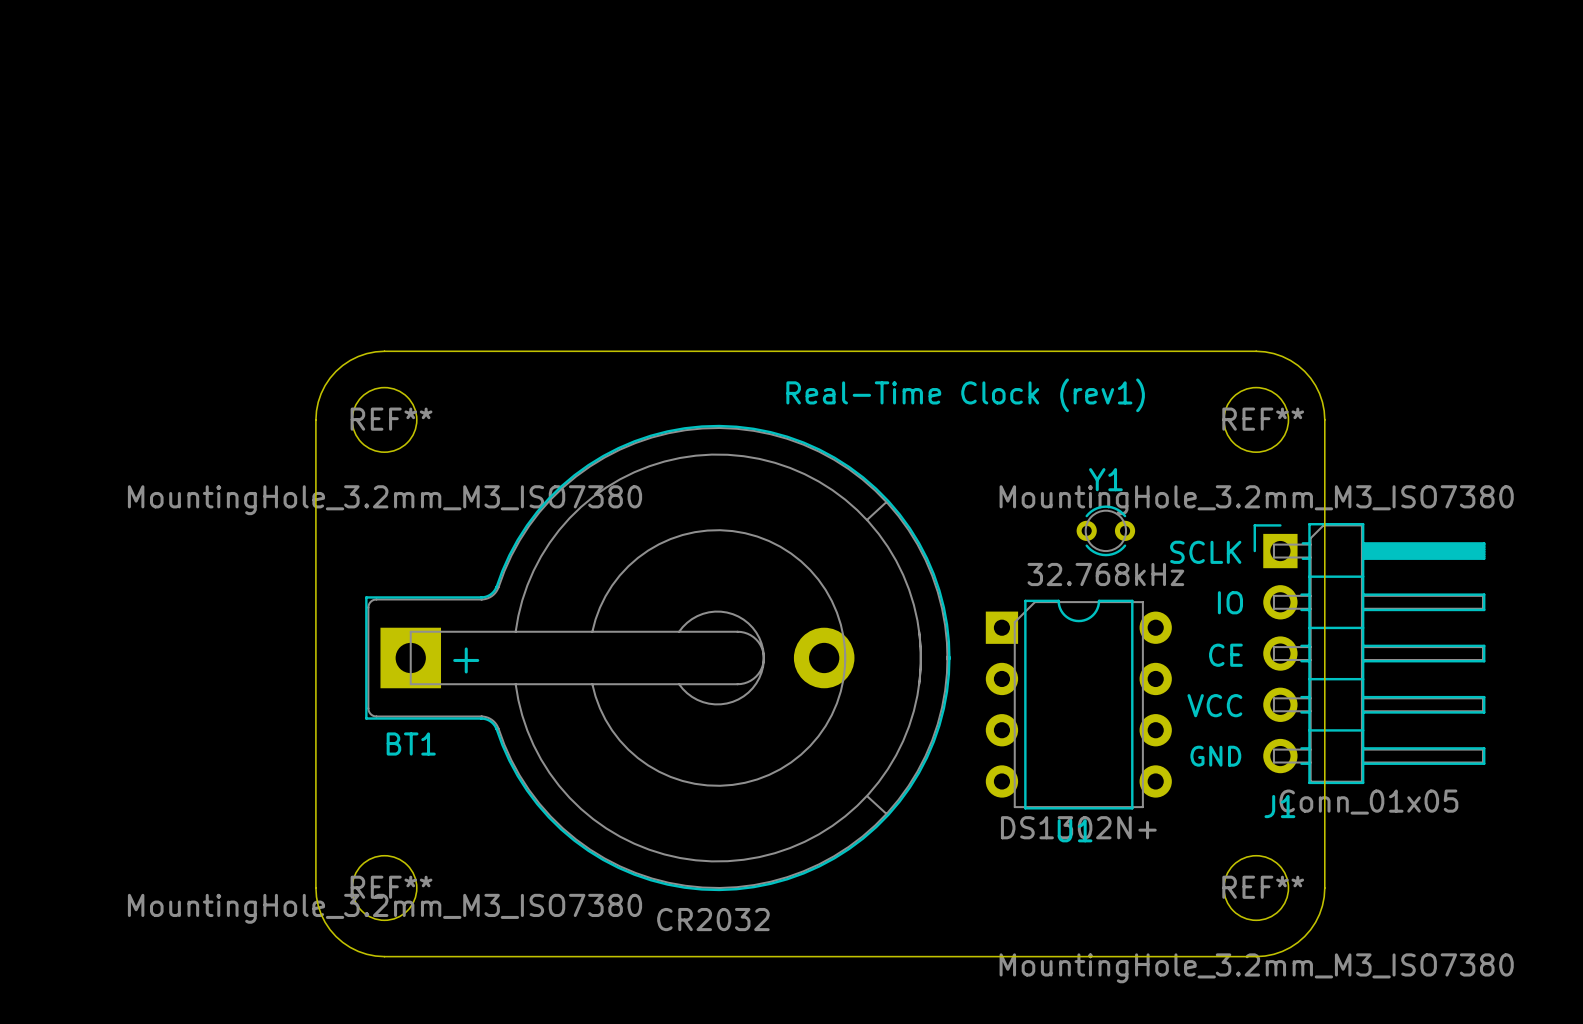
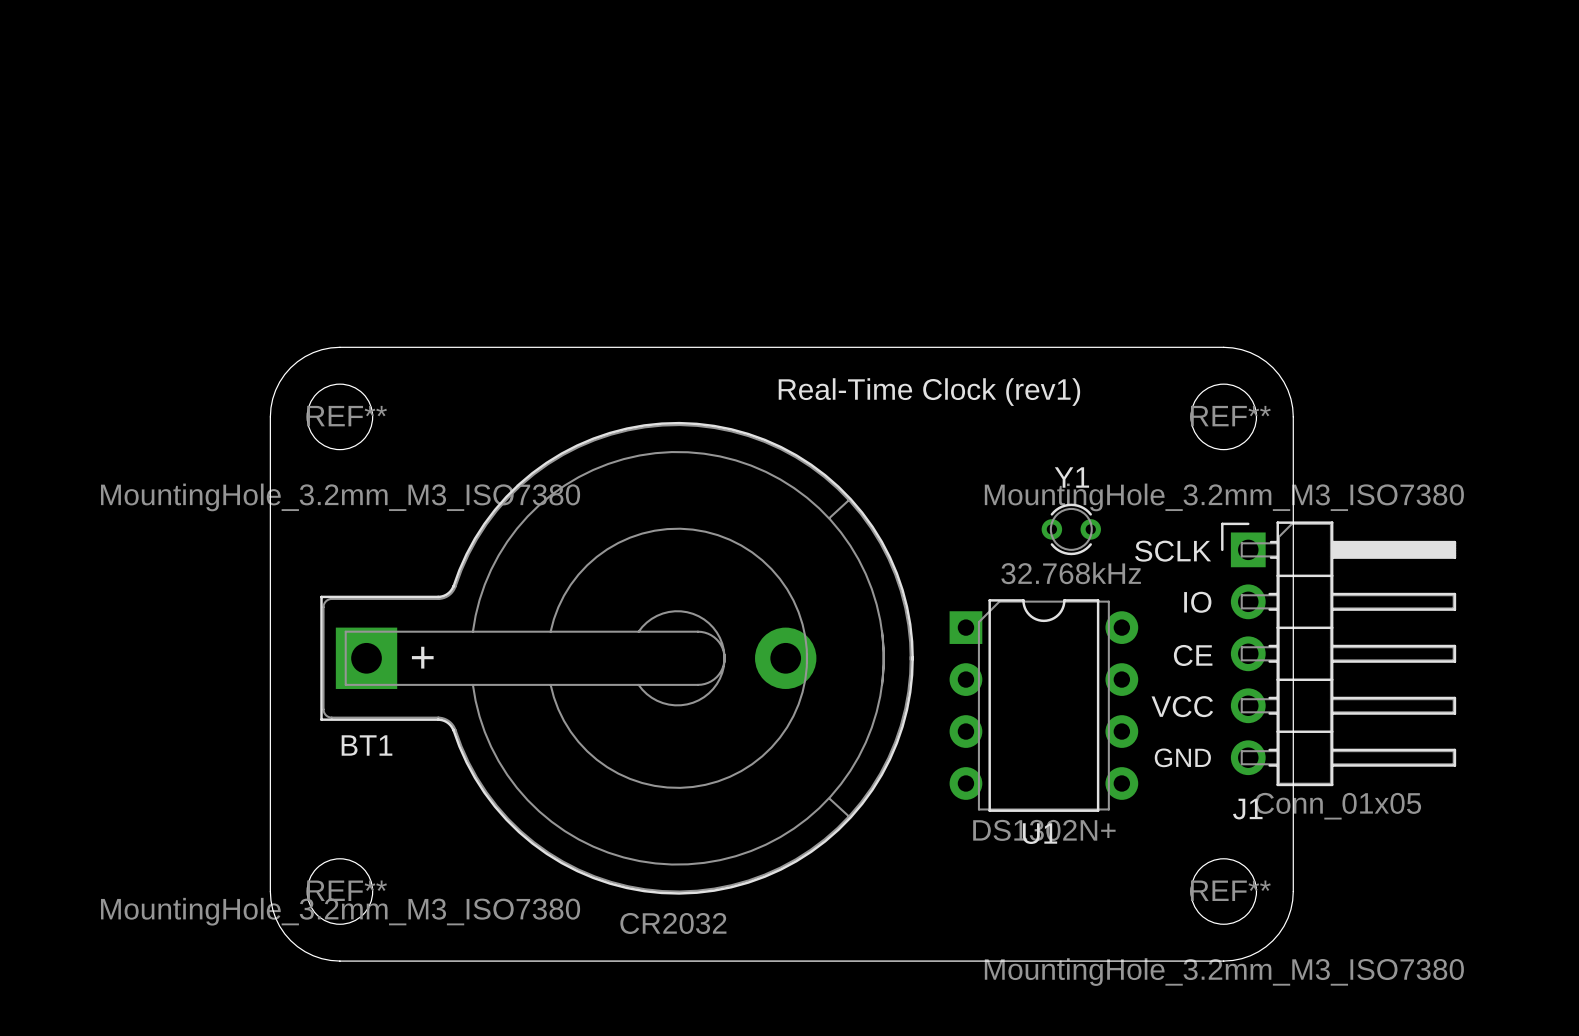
BT1 footprint: [365, 424, 951, 892] -> [320, 421, 914, 895]

